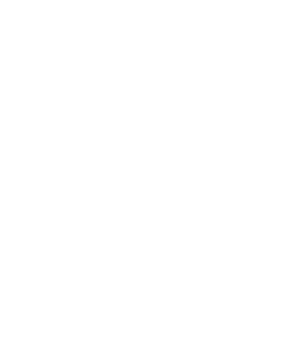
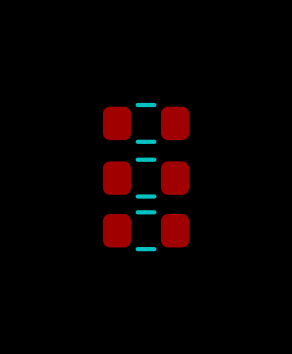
part: none -> (146, 123)
part: none -> (146, 178)
part: none -> (146, 230)

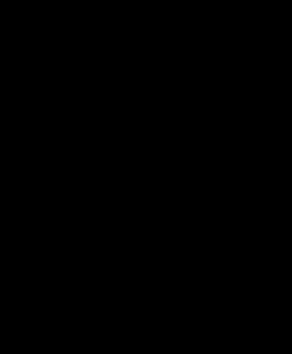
part: (146, 123) -> none
part: (146, 178) -> none
part: (146, 230) -> none

